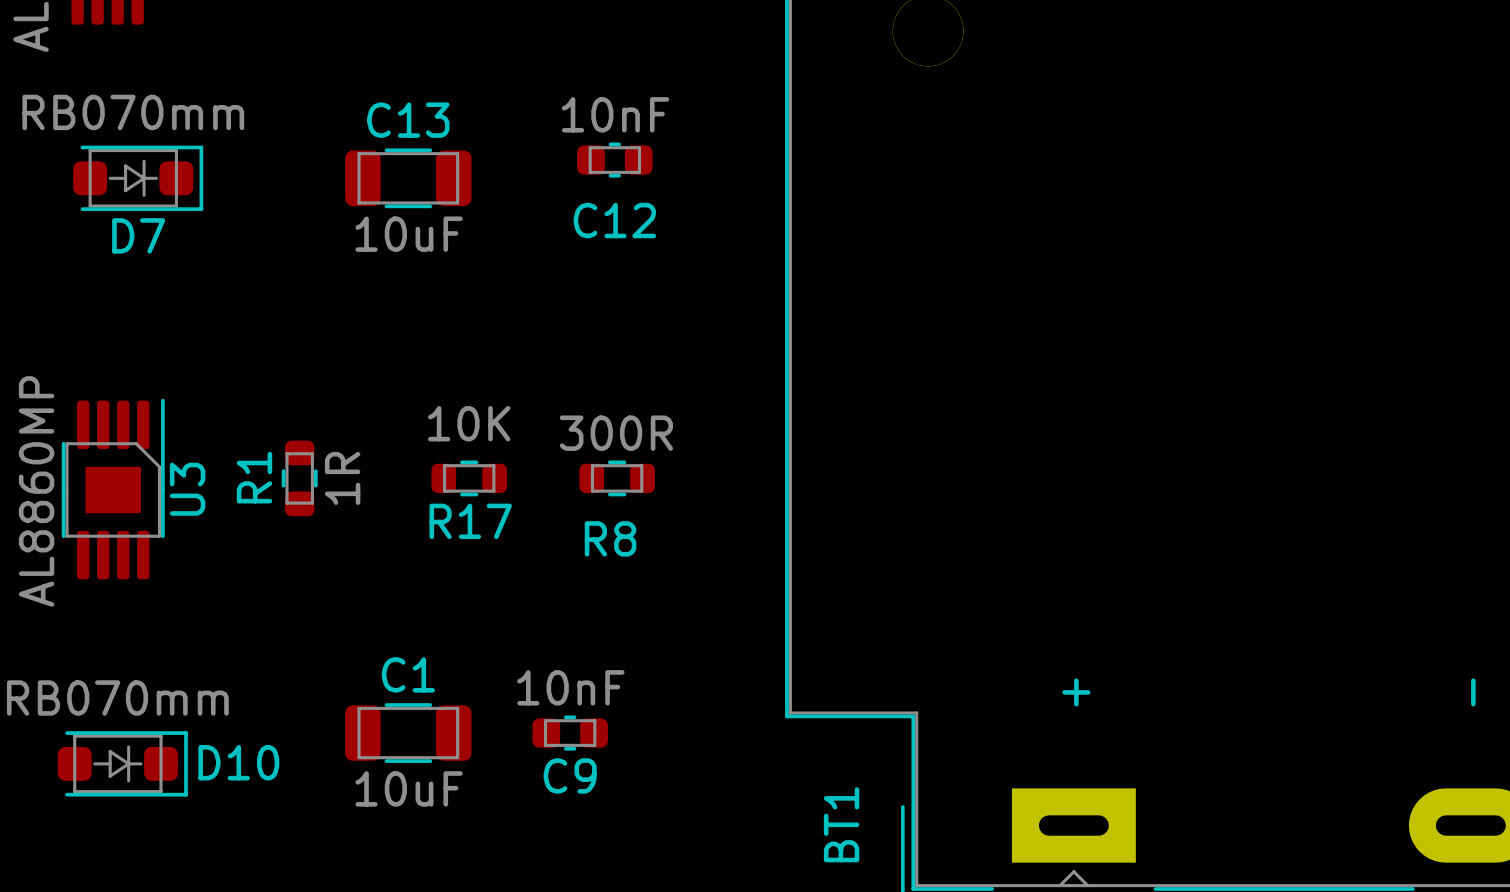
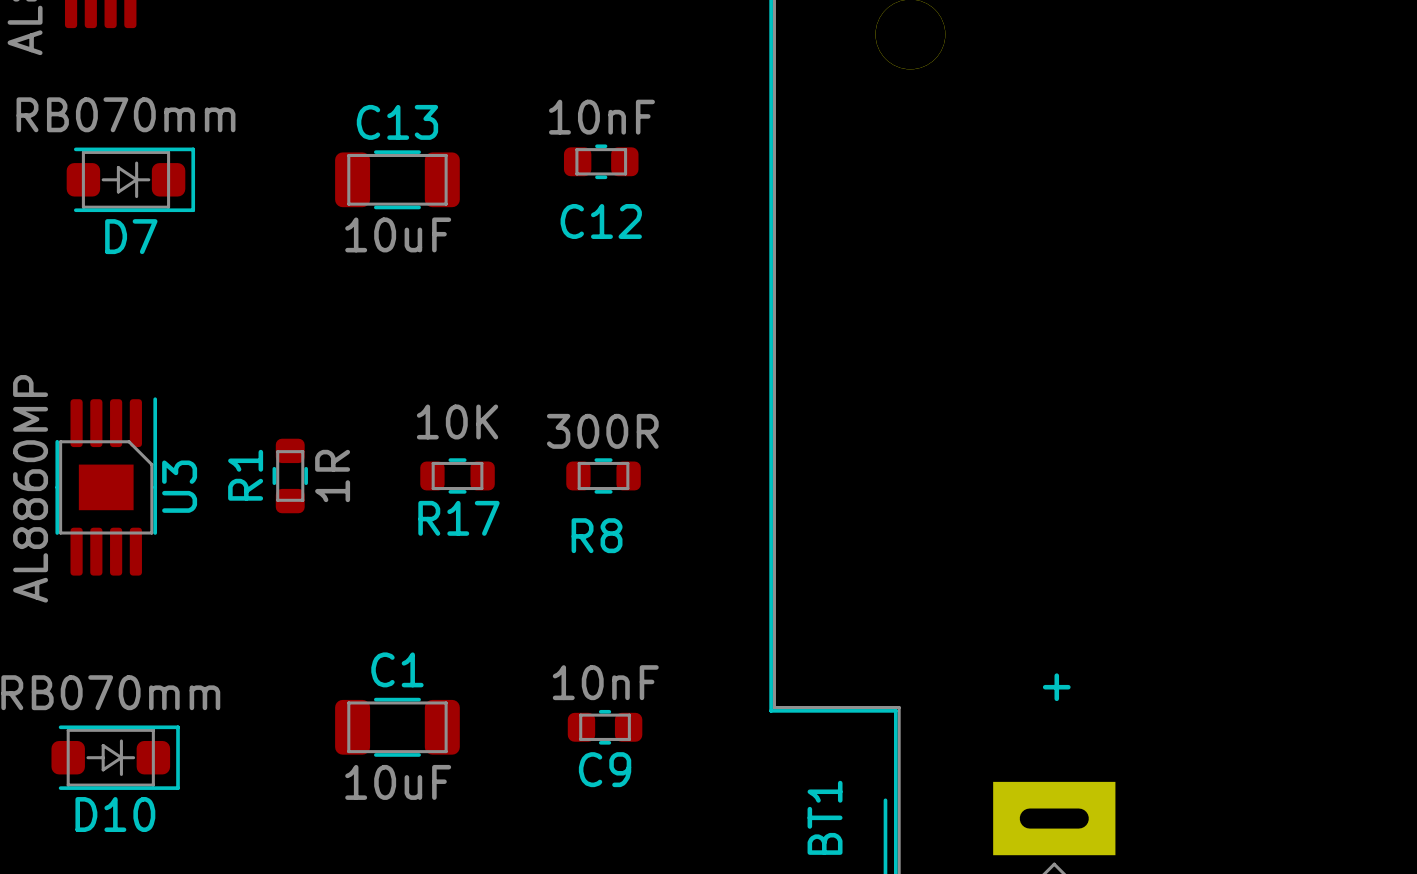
C9 position: (570, 733) -> (605, 727)
D10 name position: D10 (238, 762) -> D10 (115, 814)

